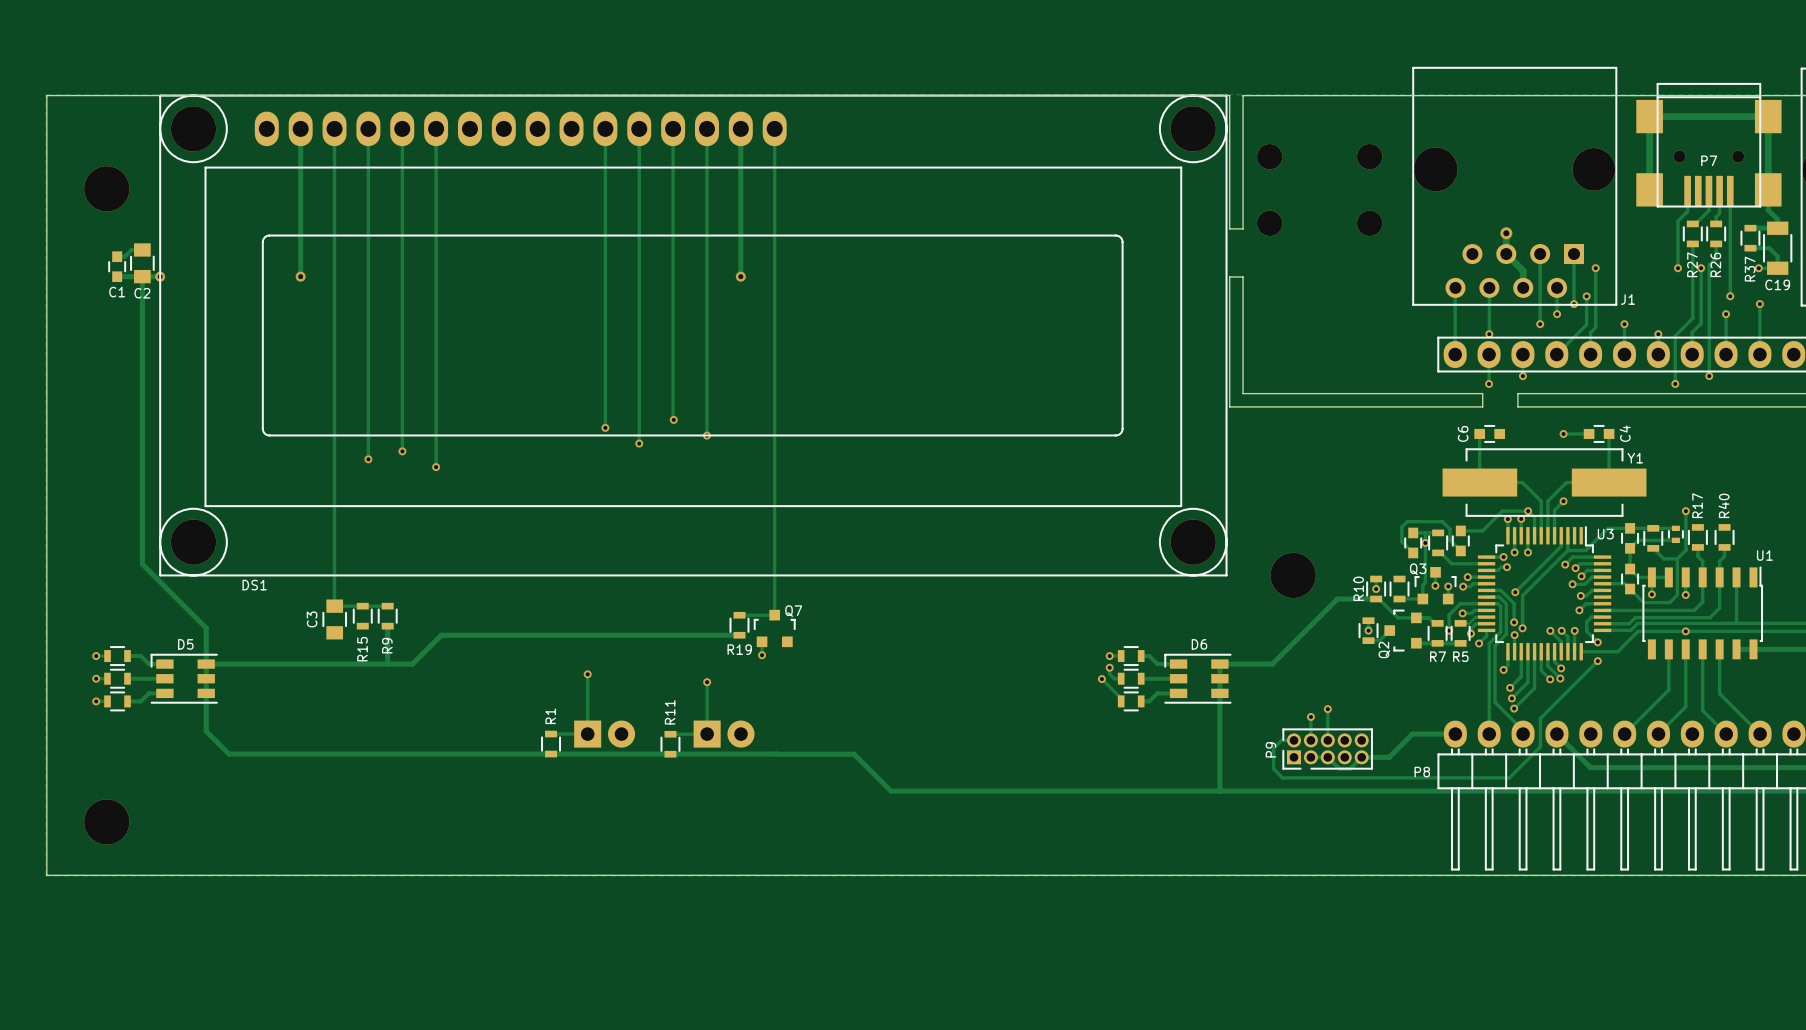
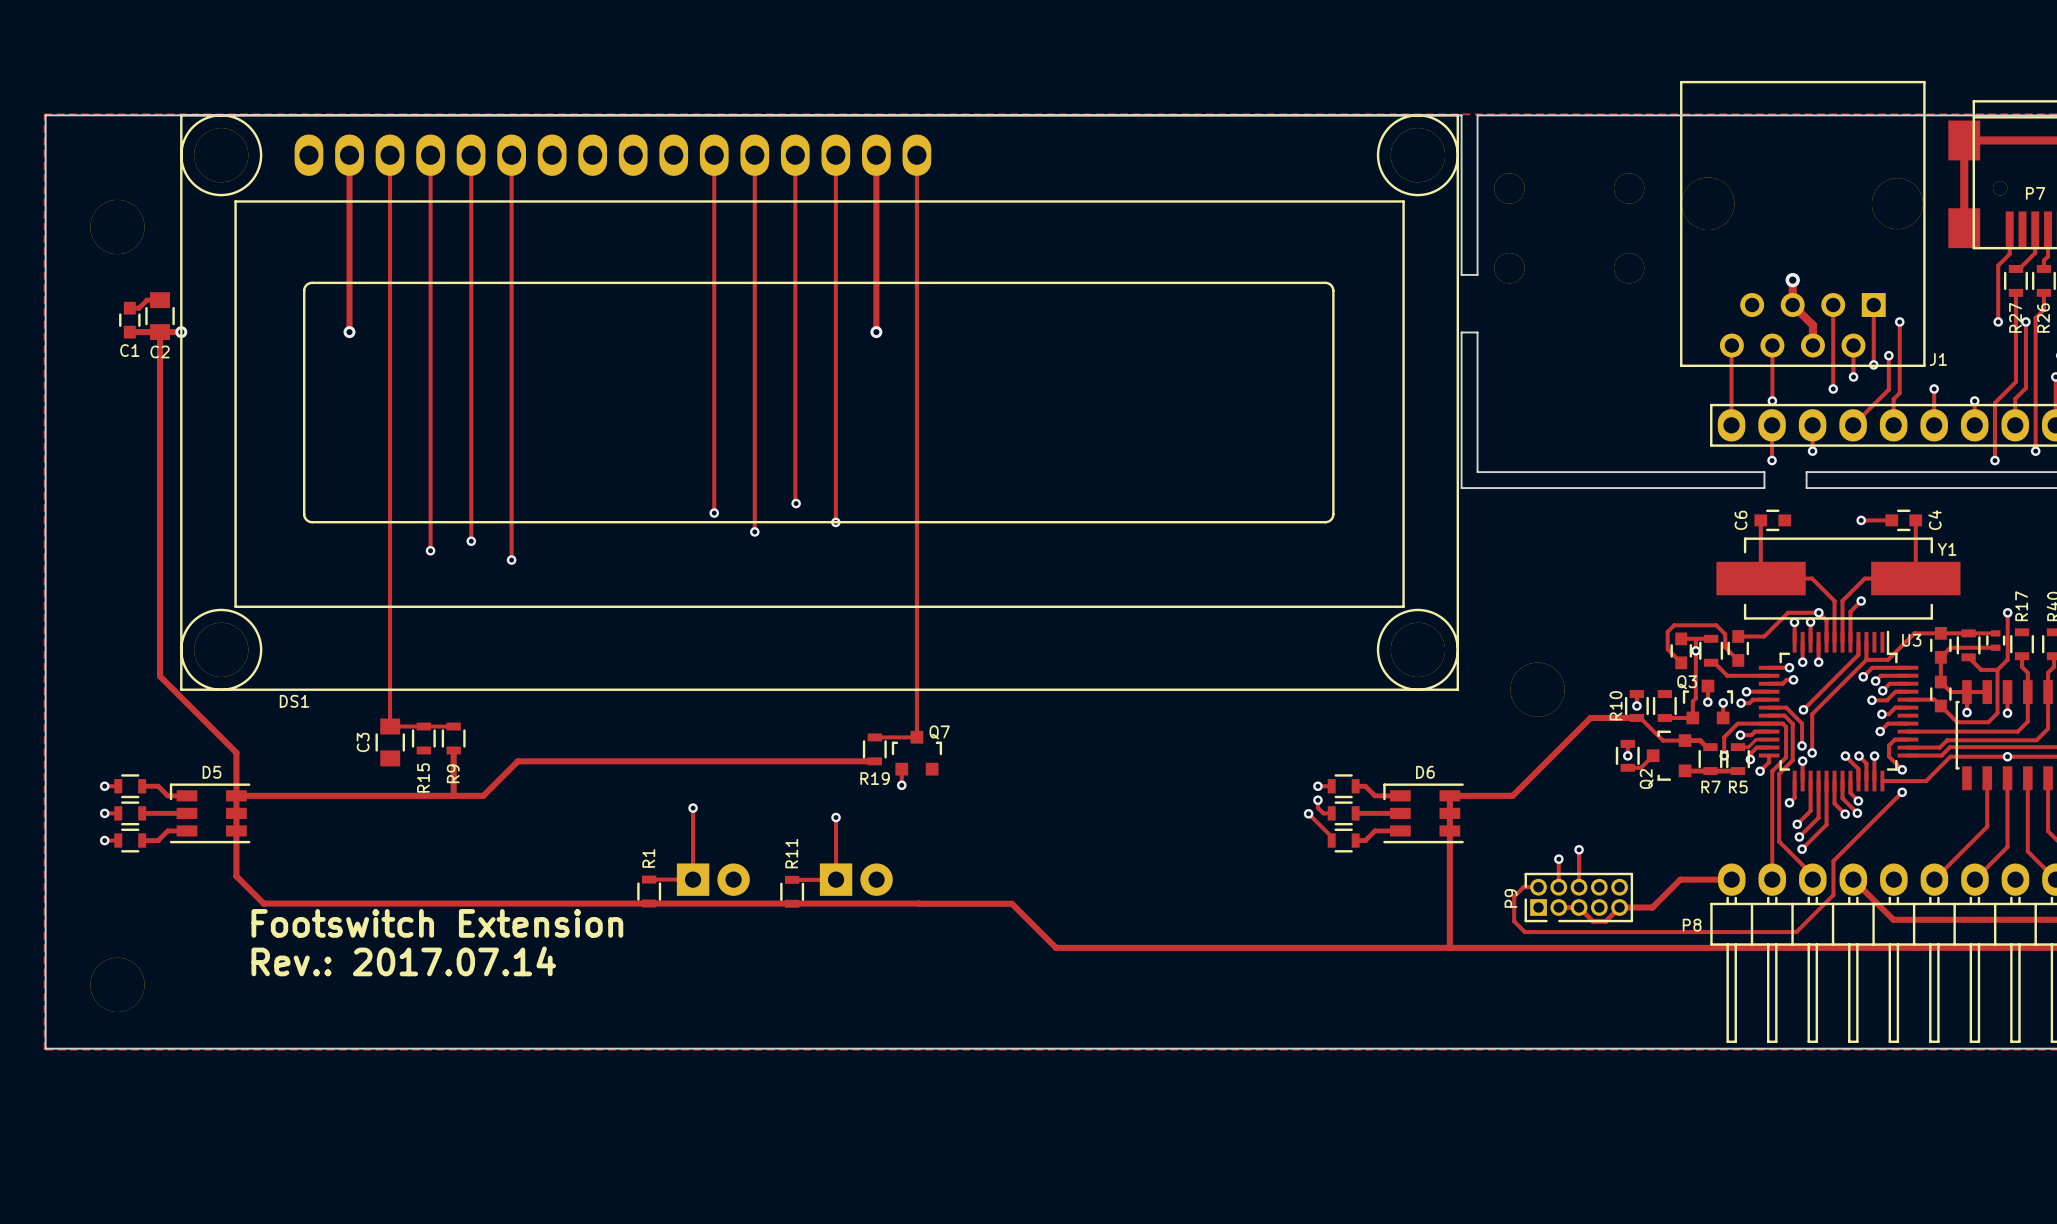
text: none -> Footswitch Extension (437, 923)
text: none -> Rev.: 2017.07.14 (403, 961)

